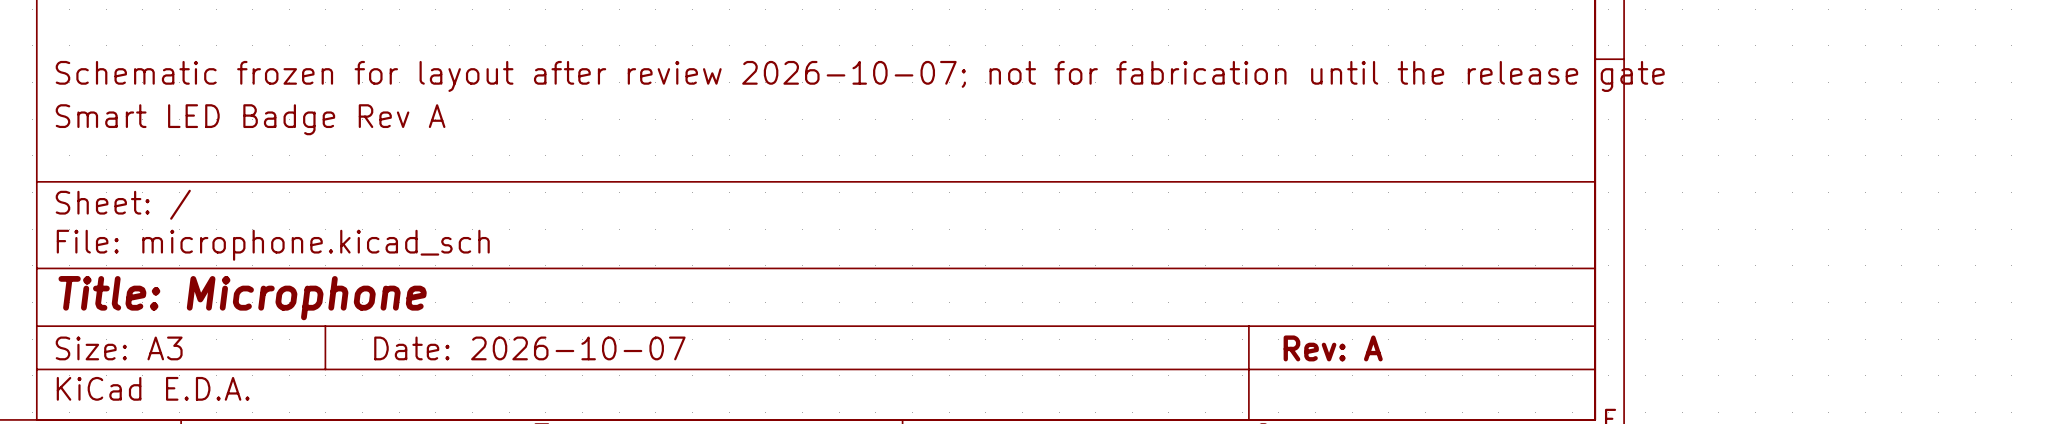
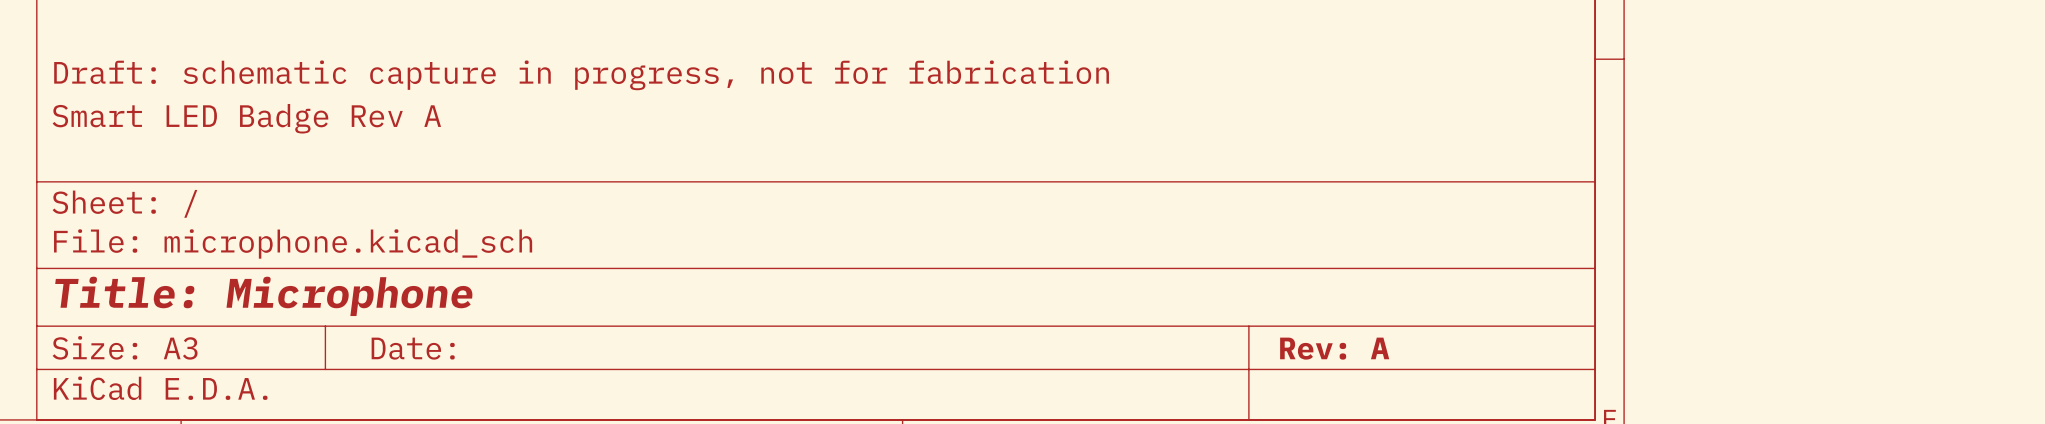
title block: Schematic frozen for layout after review 2026-10-07; not for fabrication until the release gate (860, 76) -> Draft: schematic capture in progress, not for fabrication (581, 75)
title block: Date: 2026-10-07 (529, 348) -> Date: (413, 348)

